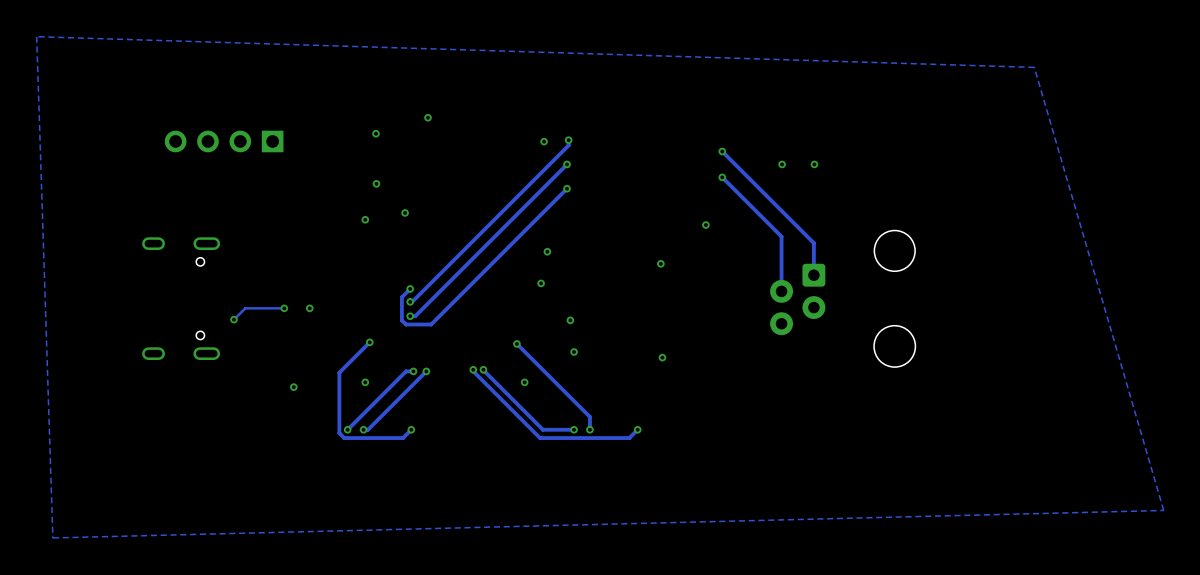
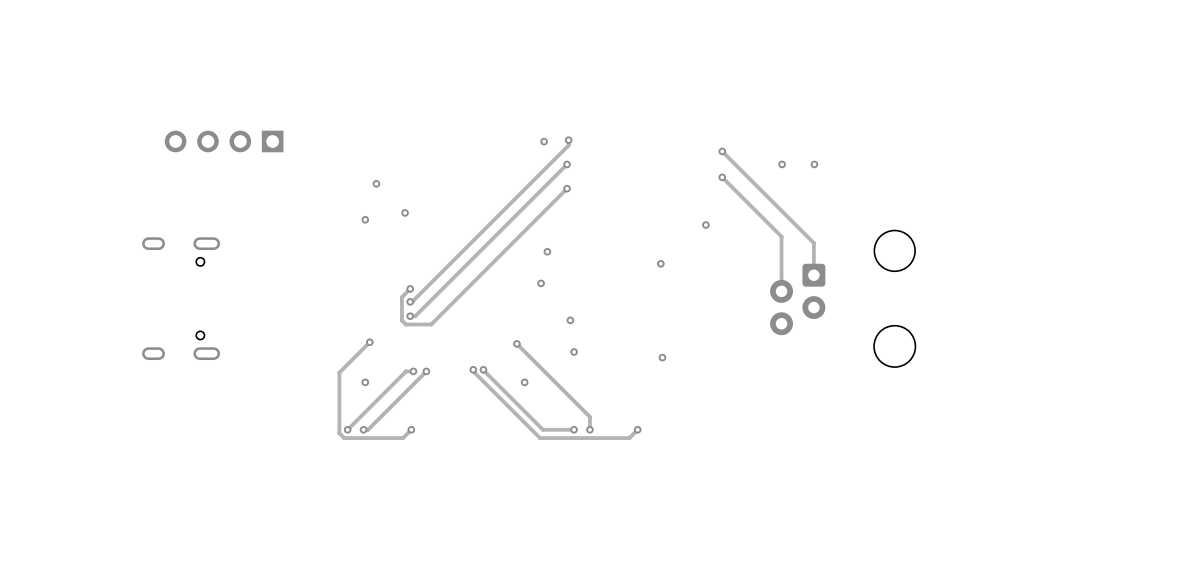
zone outline: (36, 36) (1034, 67) (1163, 510) (52, 537) (36, 36) -> none
via: (427, 117) -> none
via: (375, 133) -> none
track: (284, 308) (245, 308) (233, 319) -> none
via: (284, 308) -> none
via: (309, 308) -> none
via: (233, 319) -> none
via: (293, 387) -> none

